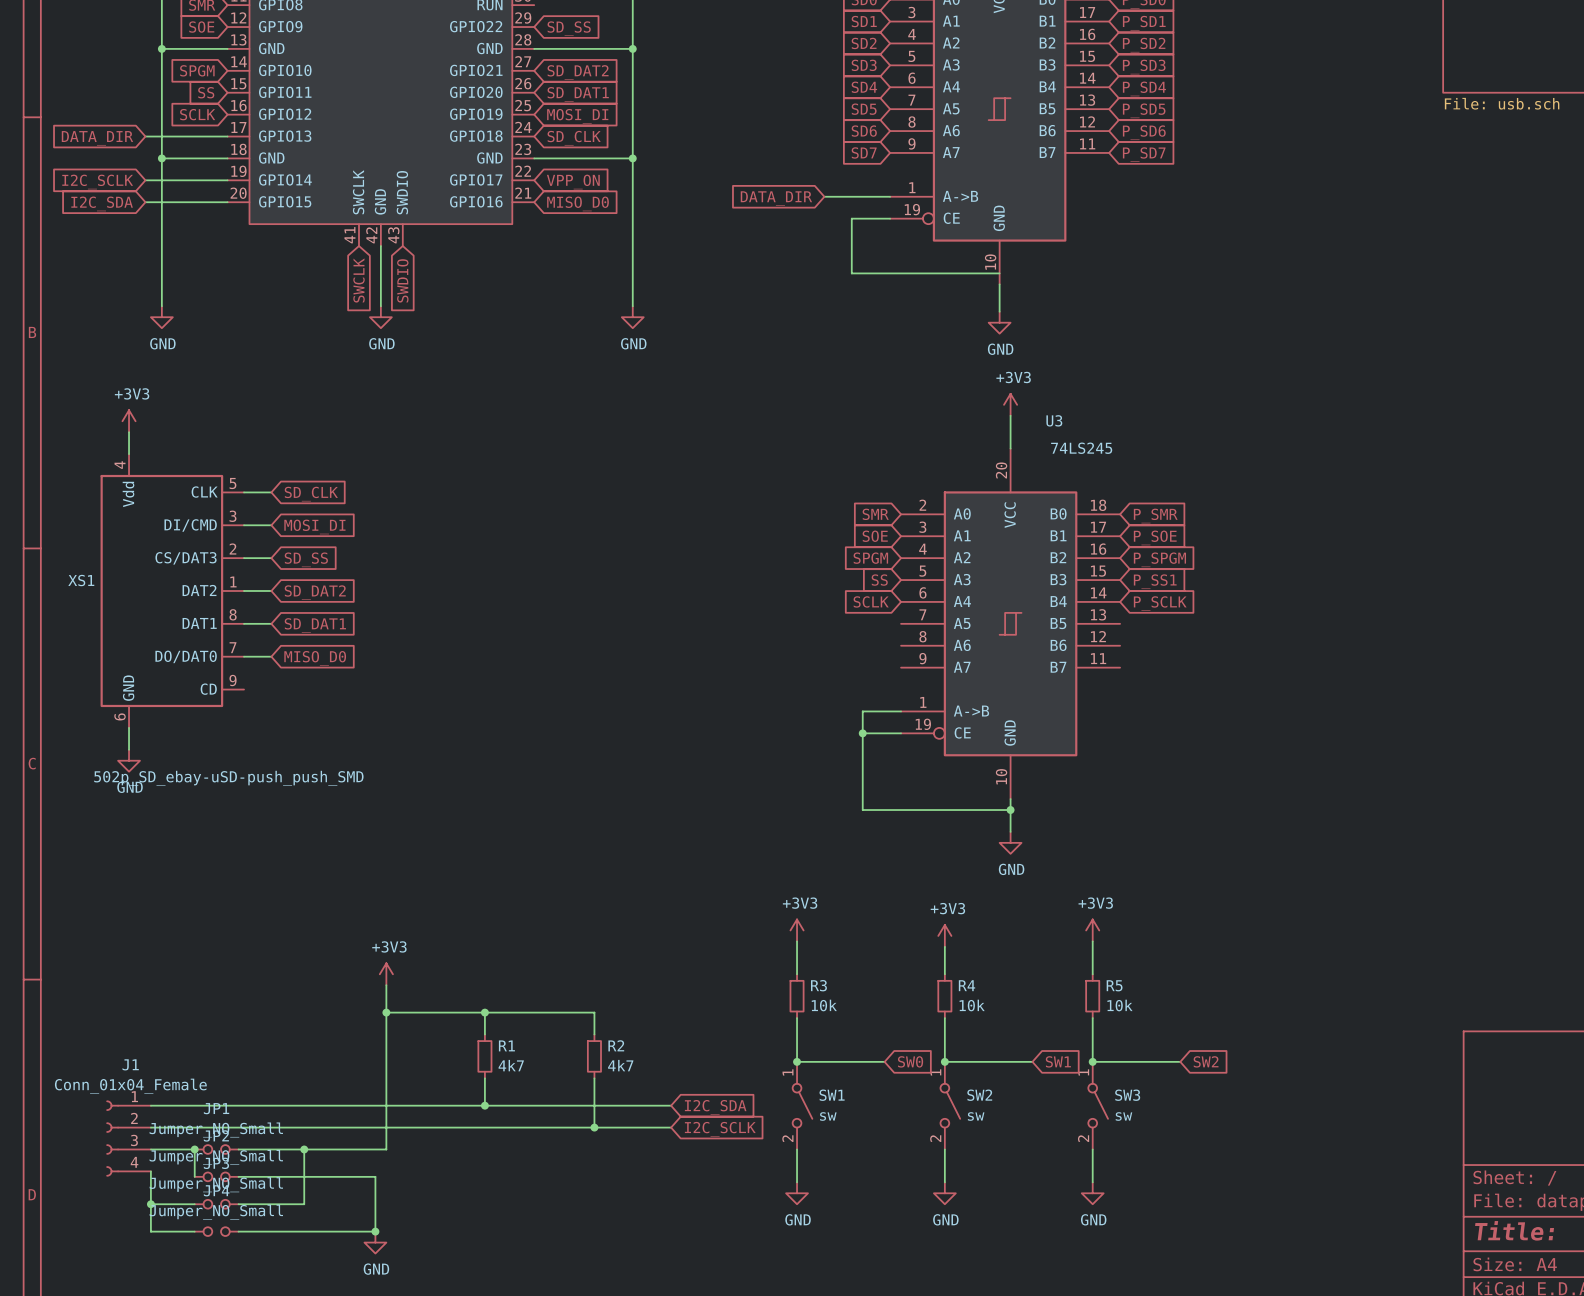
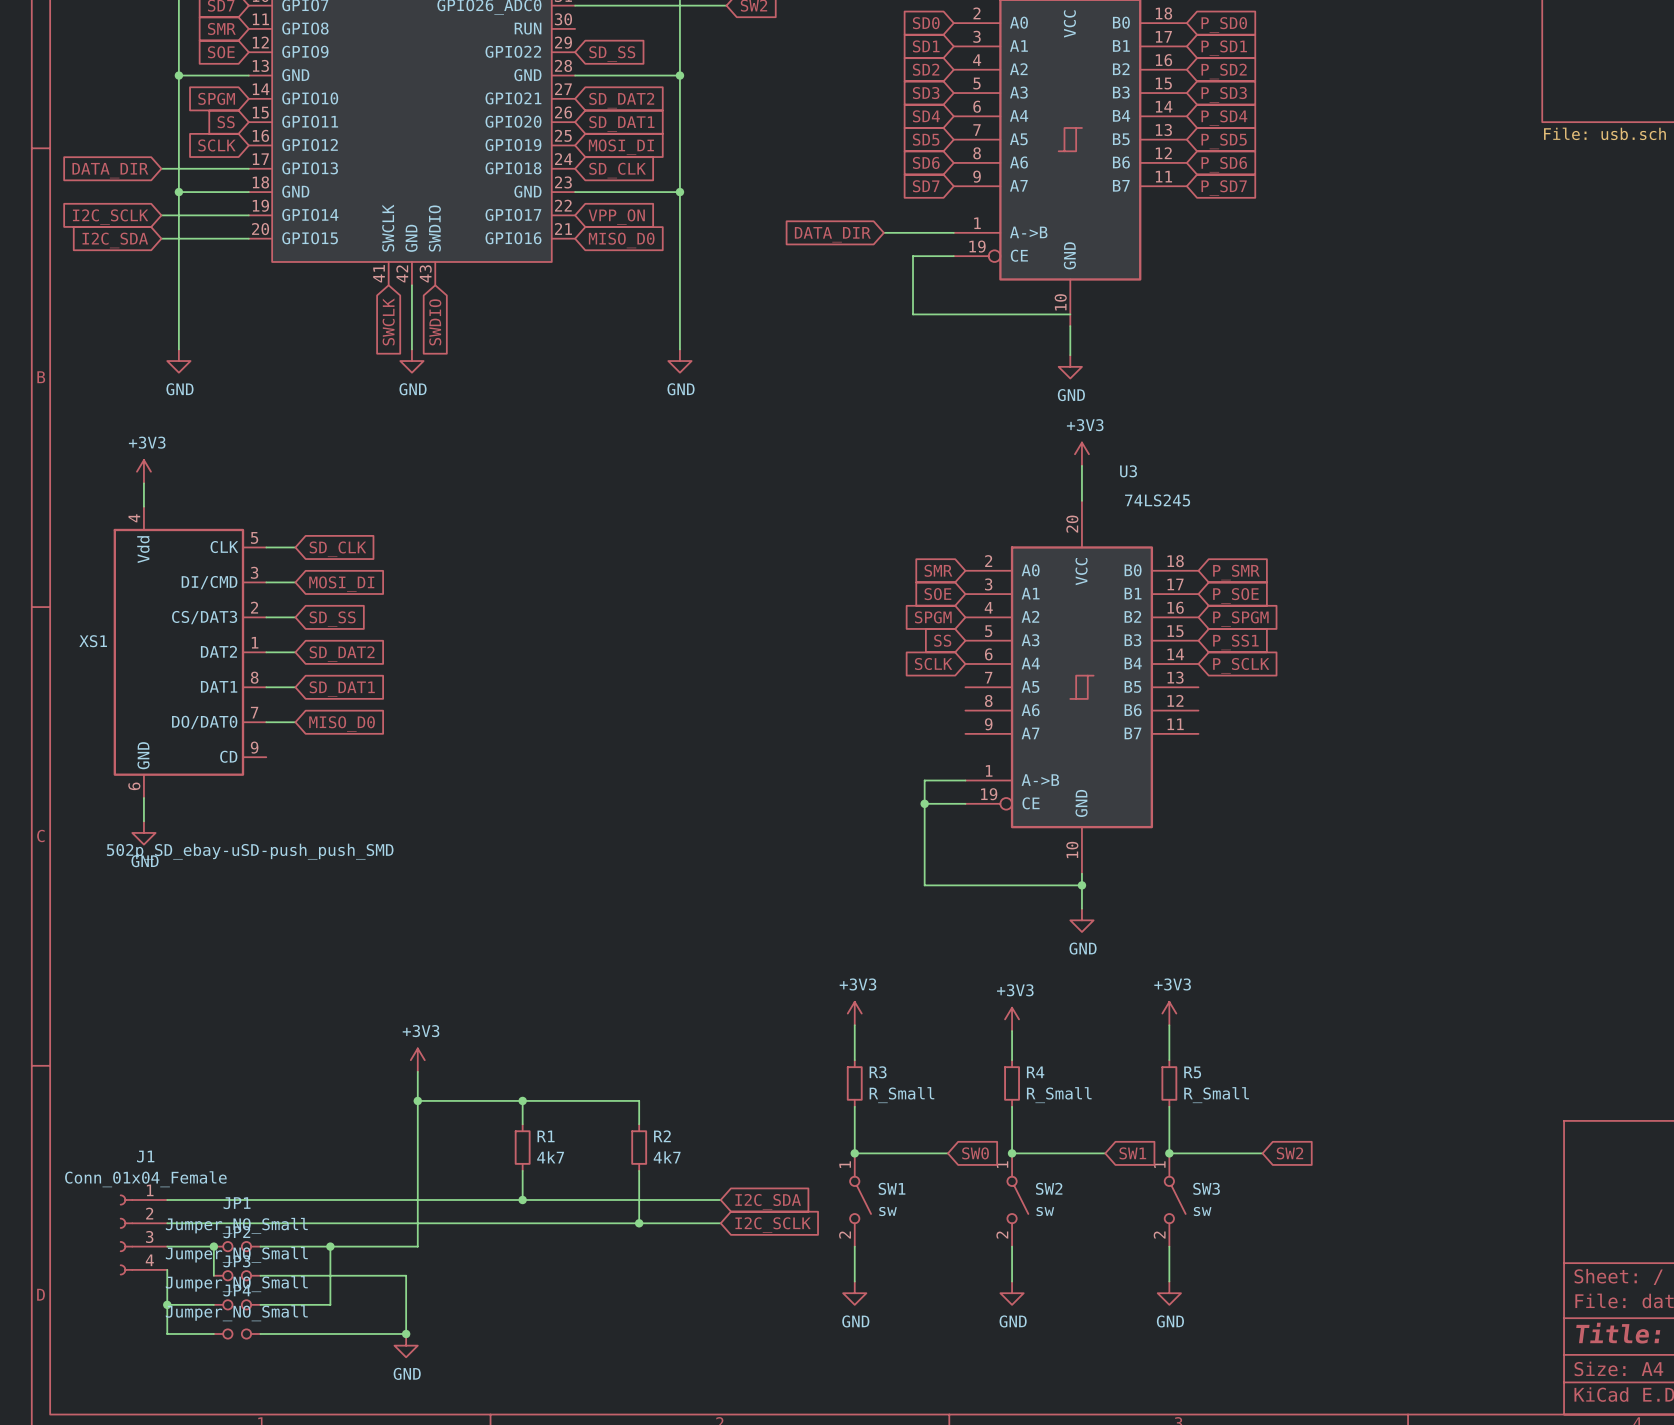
R3 value: 10k (824, 1005) -> R_Small (901, 1095)
R4 value: 10k (972, 1005) -> R_Small (1059, 1095)
R5 value: 10k (1119, 1005) -> R_Small (1216, 1095)

